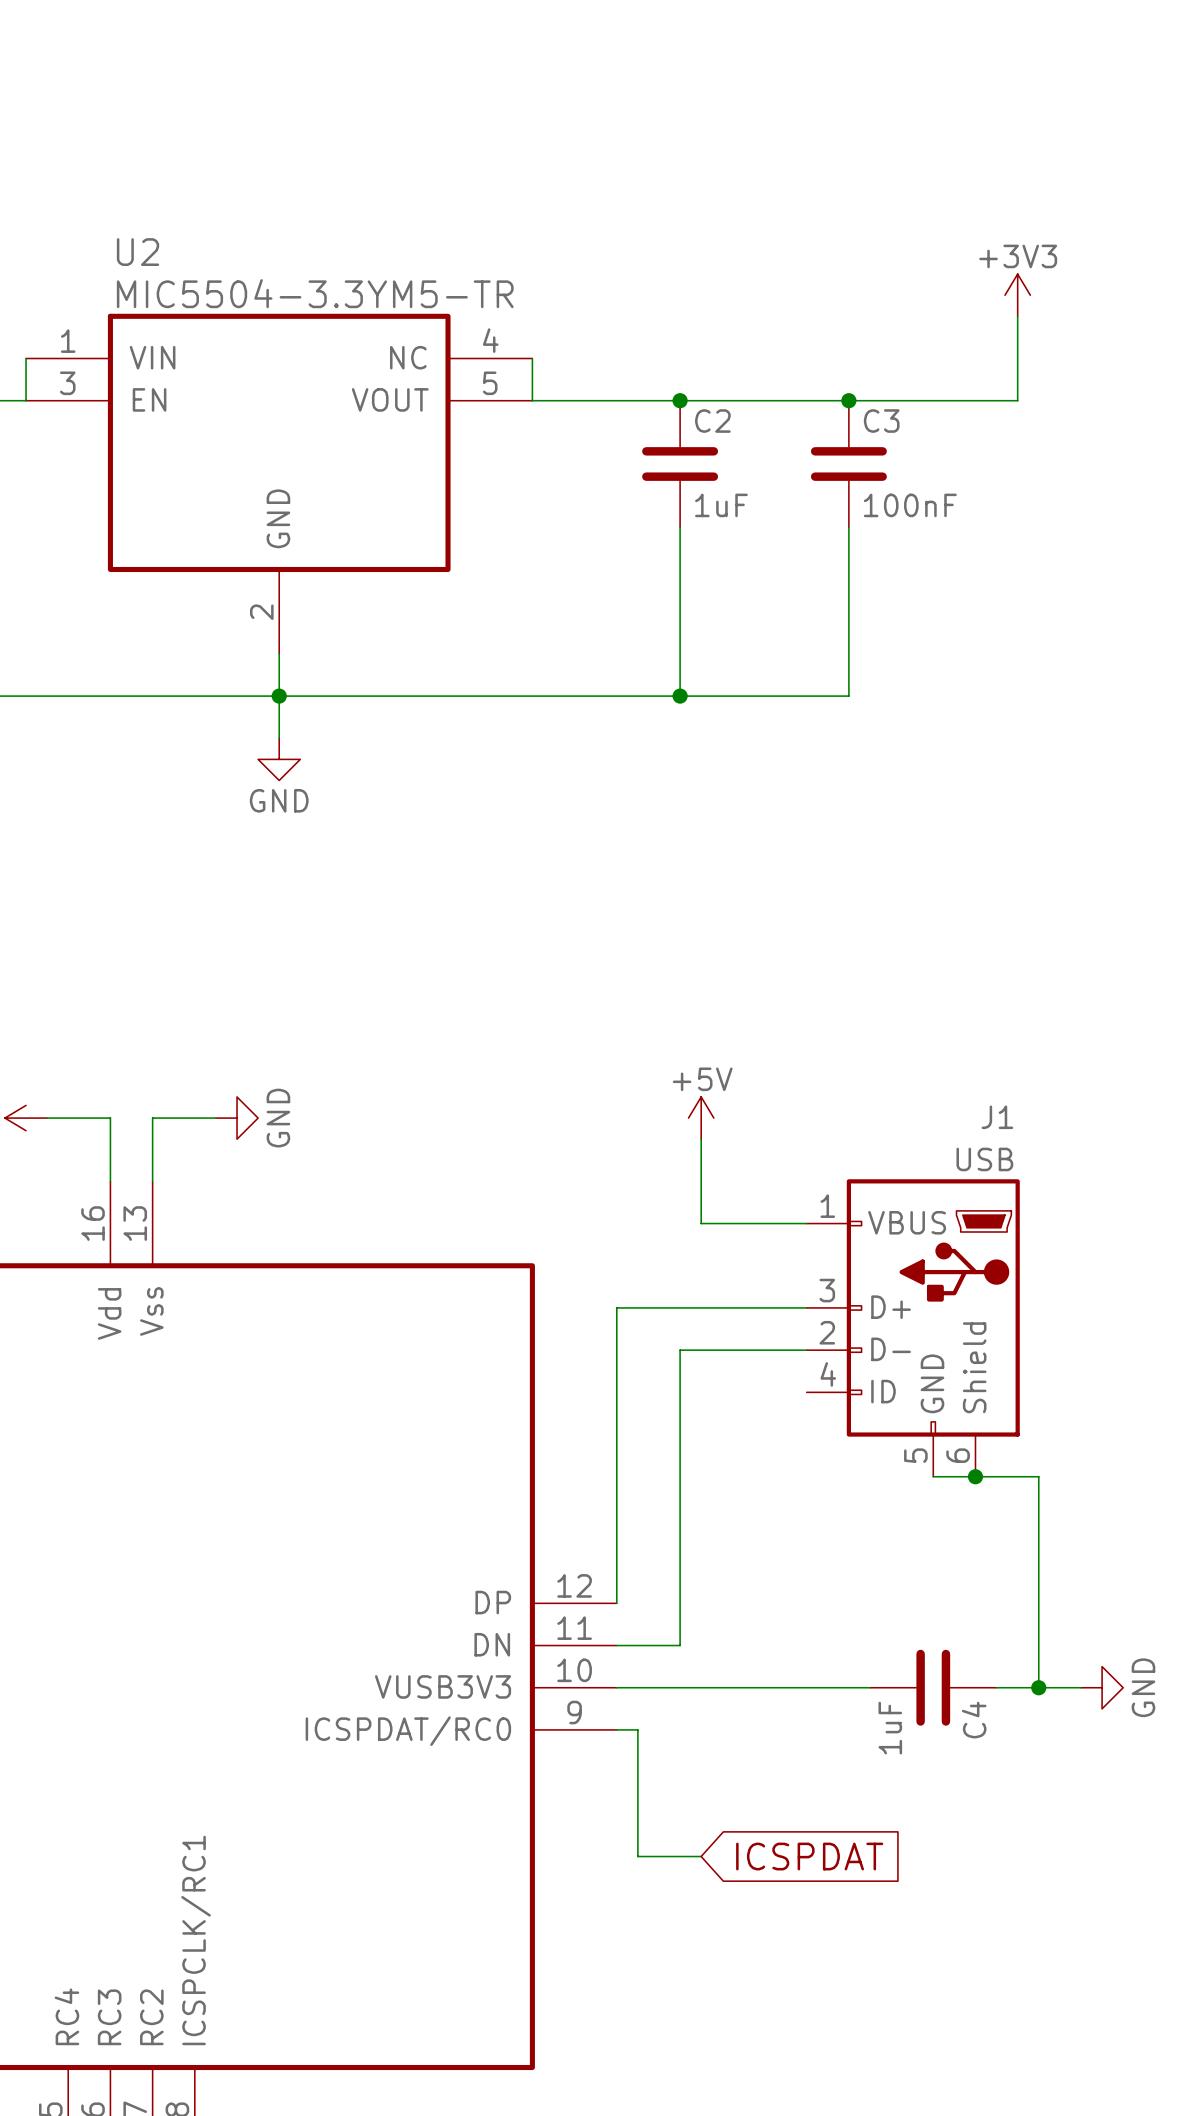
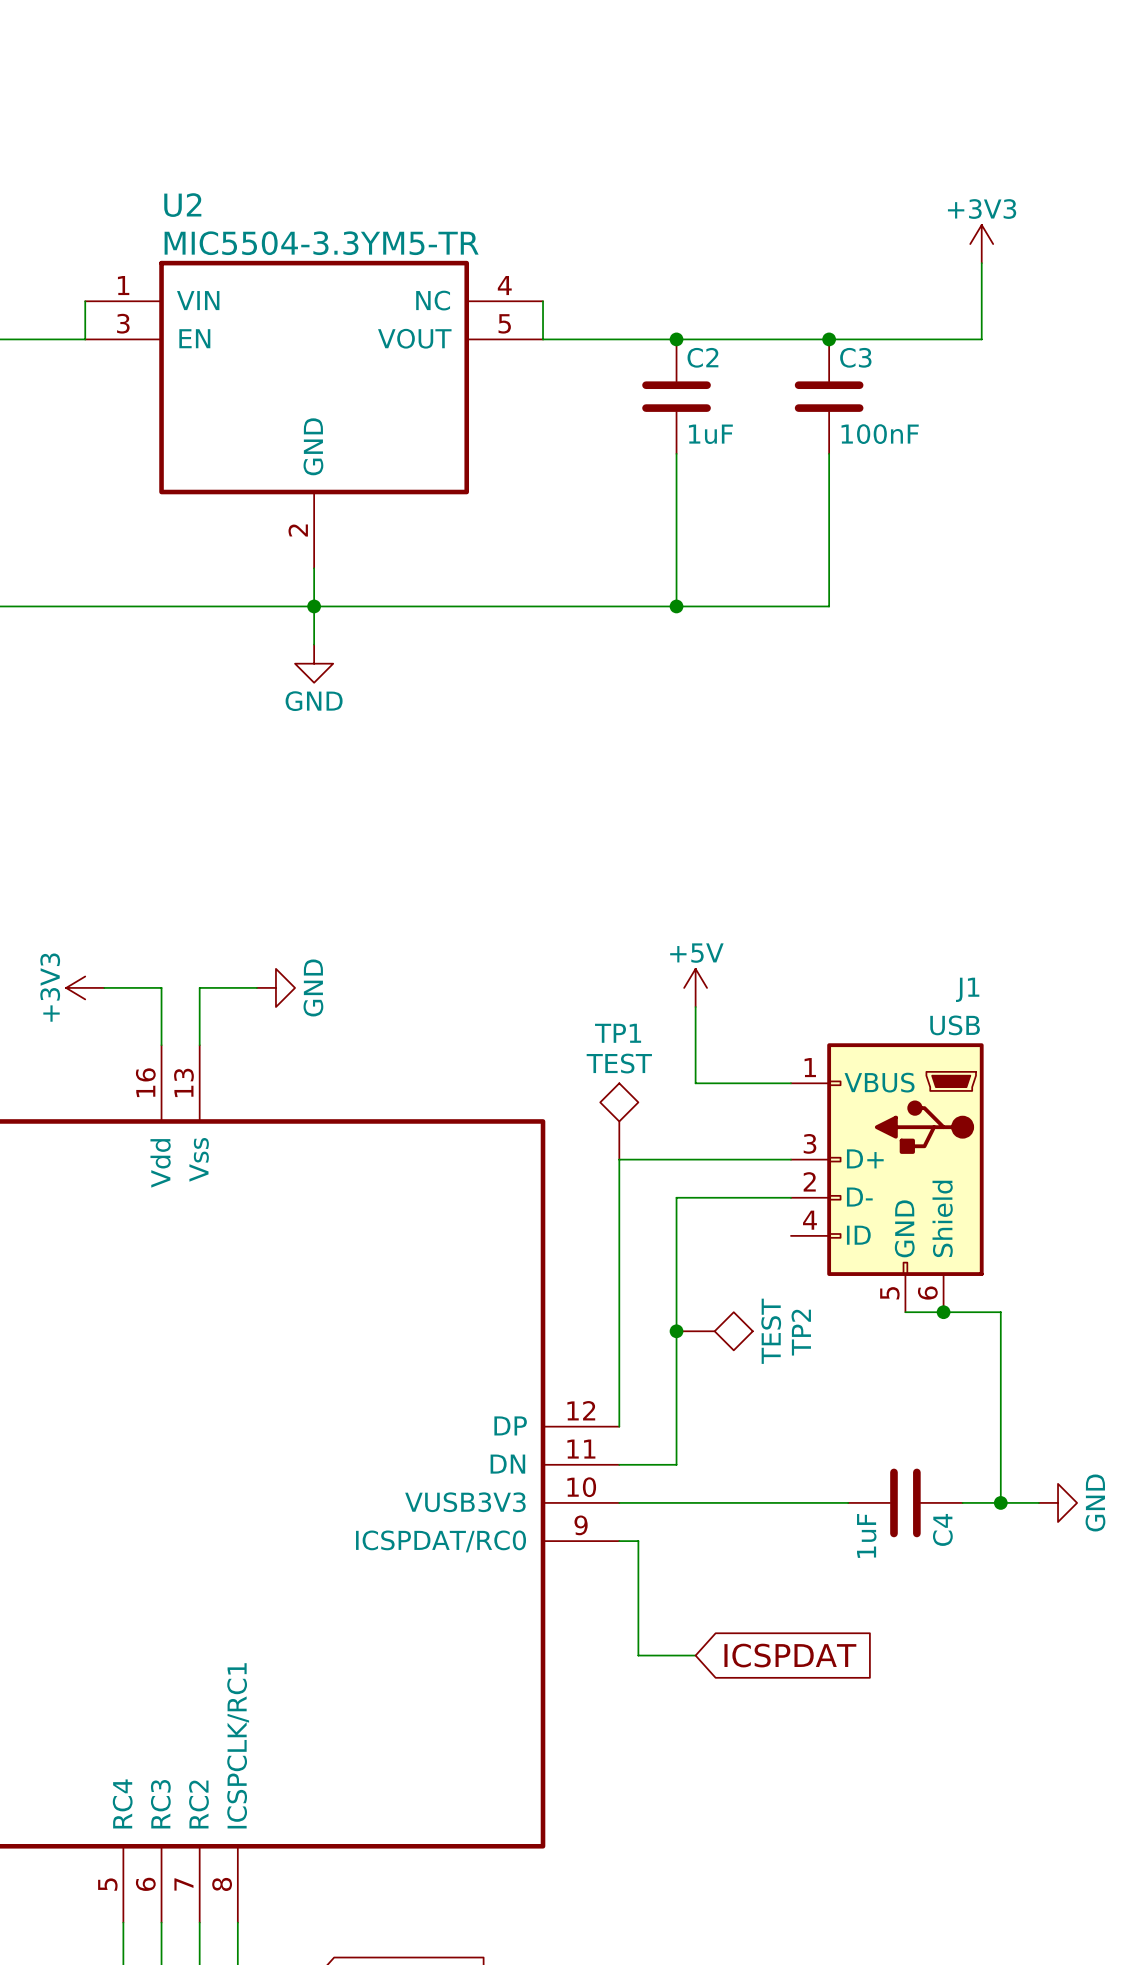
TP1: none -> TEST (619, 1121)
junction: none -> (676, 1331)
TP2: none -> TEST (714, 1331)

